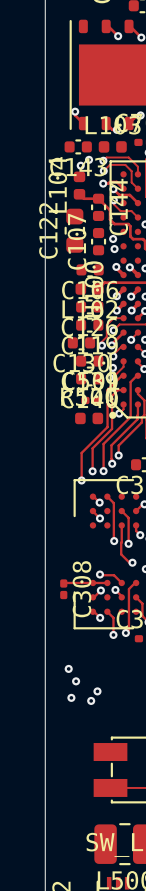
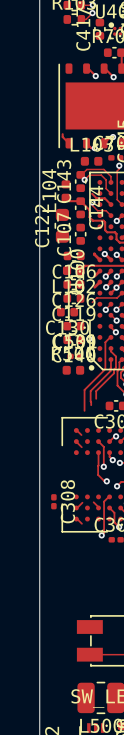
via: (75, 111) -> none
C143 rotation: 0° (78, 146) -> 90° clockwise (80, 181)
C143 position: (78, 146) -> (80, 181)
via: (89, 159) -> none
via: (103, 160) -> none
via: (80, 165) -> none
track: (103, 183) (116, 181) (123, 188) -> none
via: (103, 183) -> none
via: (113, 189) -> none
via: (113, 238) -> none
via: (114, 249) -> none
via: (116, 266) -> none
via: (116, 296) -> none
via: (116, 310) -> none
track: (123, 318) (113, 318) (106, 325) (106, 336) (101, 342) (101, 345) -> none
via: (113, 330) -> none
track: (123, 332) (111, 345) -> none
via: (101, 345) -> none
via: (111, 345) -> none
track: (123, 346) (121, 346) (113, 356) -> none
via: (113, 356) -> none
track: (123, 361) (123, 366) (112, 377) (109, 377) -> none
via: (112, 367) -> none
track: (123, 375) (107, 390) (107, 427) (81, 452) (81, 480) -> none
track: (123, 390) (117, 390) (112, 395) (112, 428) (92, 448) (92, 471) -> none
track: (123, 404) (123, 409) (119, 413) -> none
via: (119, 413) -> none
via: (118, 455) -> none
via: (112, 463) -> none
via: (92, 471) -> none
via: (103, 471) -> none
via: (81, 480) -> none
track: (107, 496) (113, 503) (114, 541) -> none
via: (99, 502) -> none
via: (99, 518) -> none
via: (114, 541) -> none
track: (99, 574) (114, 575) (121, 582) -> none
via: (99, 574) -> none
track: (107, 582) (63, 583) -> none
via: (115, 589) -> none
via: (100, 590) -> none
track: (107, 611) (113, 617) (113, 634) -> none
via: (100, 617) -> none
via: (113, 634) -> none
via: (68, 668) -> none
via: (76, 681) -> none
via: (97, 691) -> none
via: (71, 697) -> none
via: (91, 700) -> none

